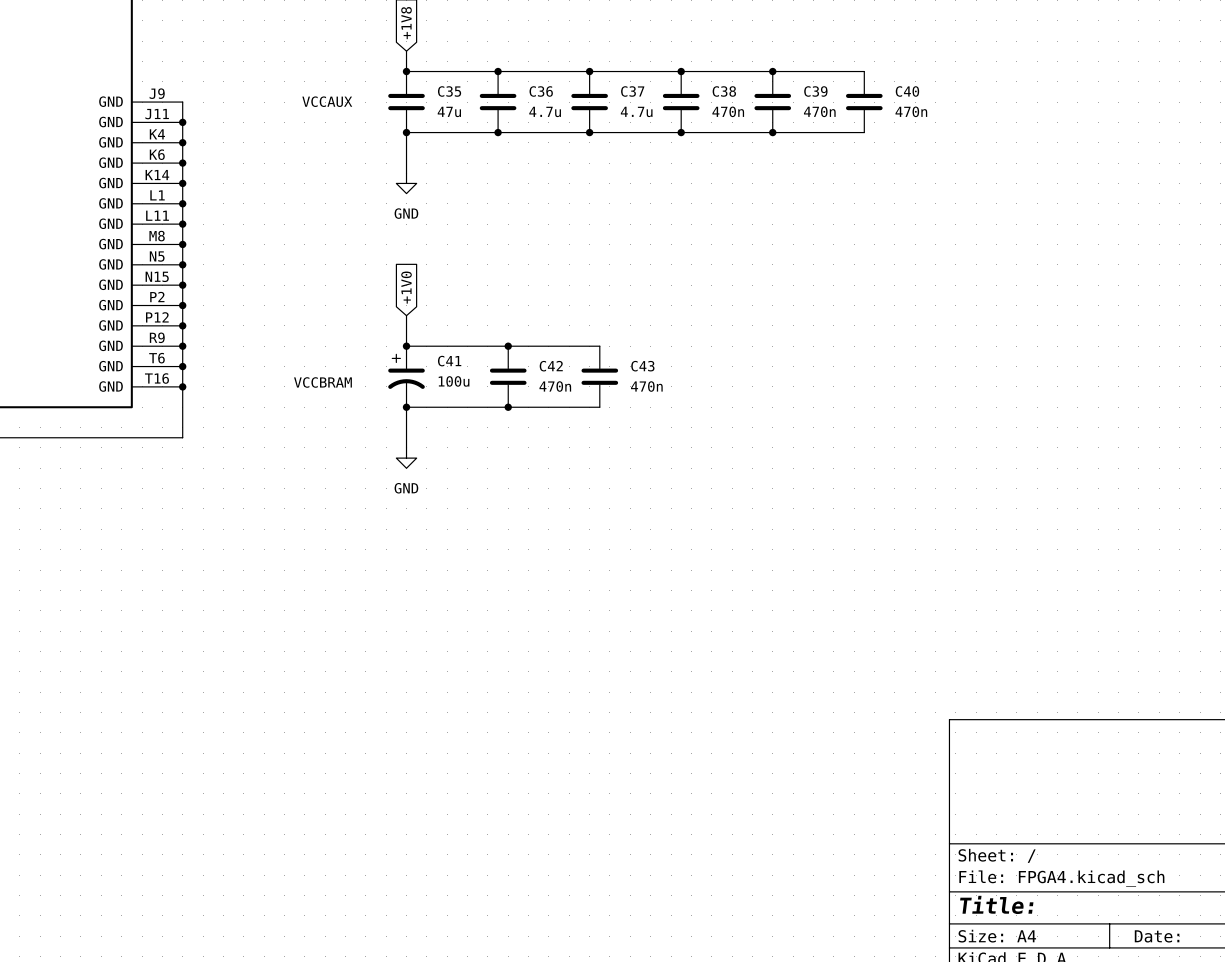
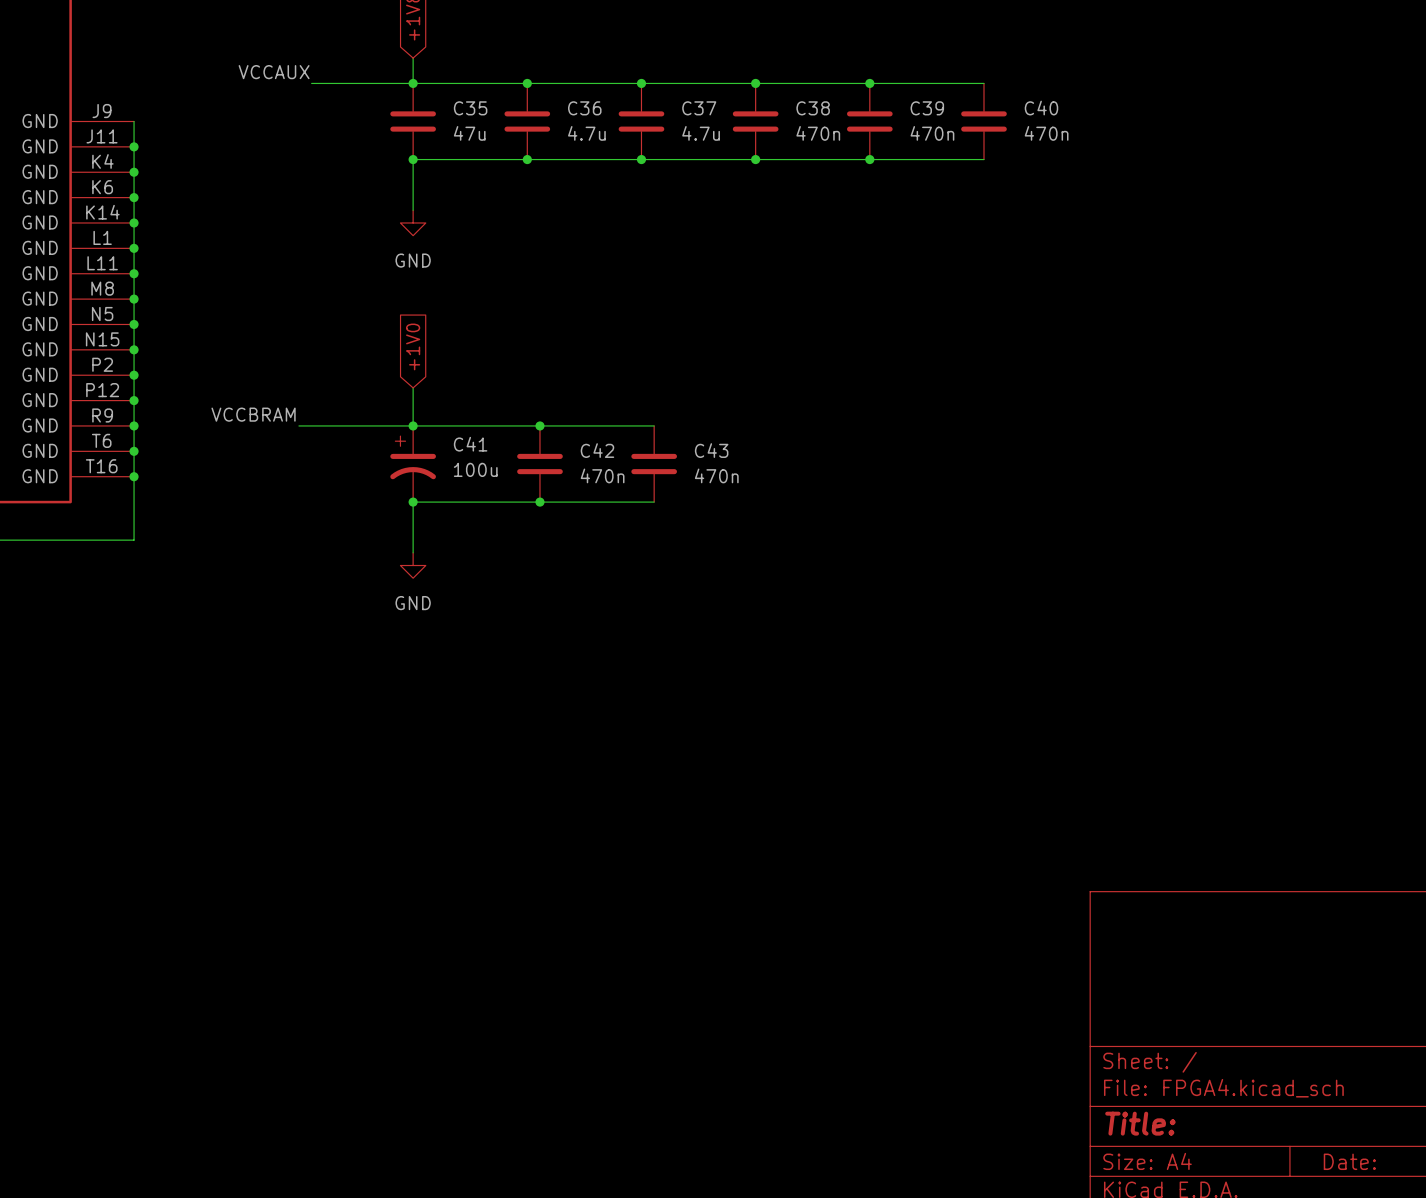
label: none -> VCCAUX (274, 72)
wire: none -> (311, 83) (413, 83)
text: VCCAUX (327, 101) -> none
label: none -> VCCBRAM (253, 414)
wire: none -> (298, 425) (413, 425)
text: VCCBRAM (322, 382) -> none

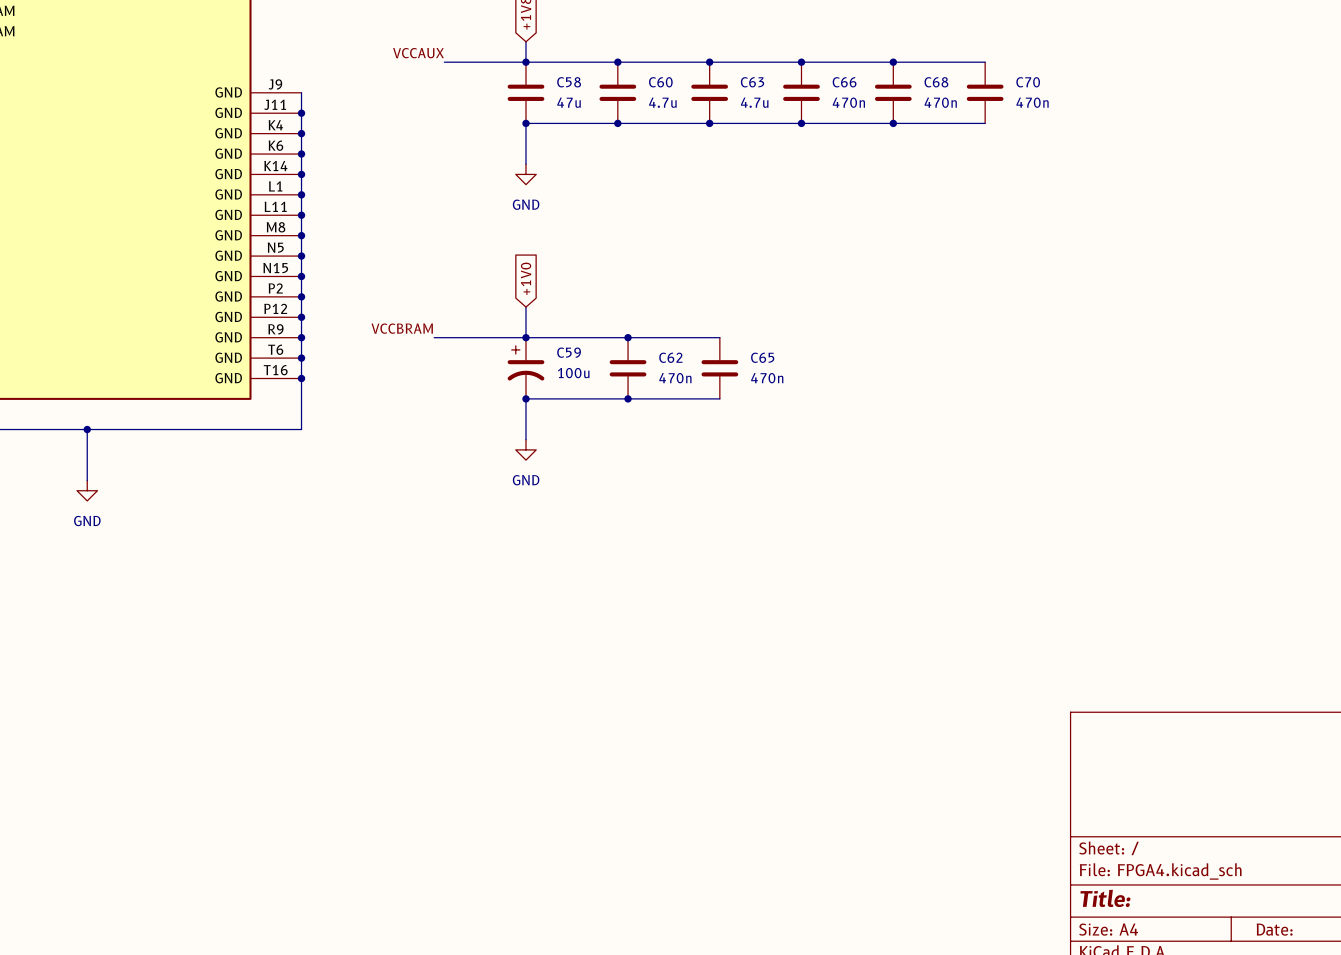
C35 name: C35 (470, 108) -> C58 (569, 82)
C36 name: C36 (584, 108) -> C60 (660, 82)
C37 name: C37 (699, 108) -> C63 (752, 82)
C38 name: C38 (813, 108) -> C66 (844, 82)
C39 name: C39 (927, 108) -> C68 (936, 82)
C40 name: C40 (1041, 108) -> C70 (1028, 82)
C41 name: C41 (470, 444) -> C59 (569, 352)
C42 name: C42 (597, 450) -> C62 (670, 357)
C43 name: C43 (711, 450) -> C65 (762, 357)

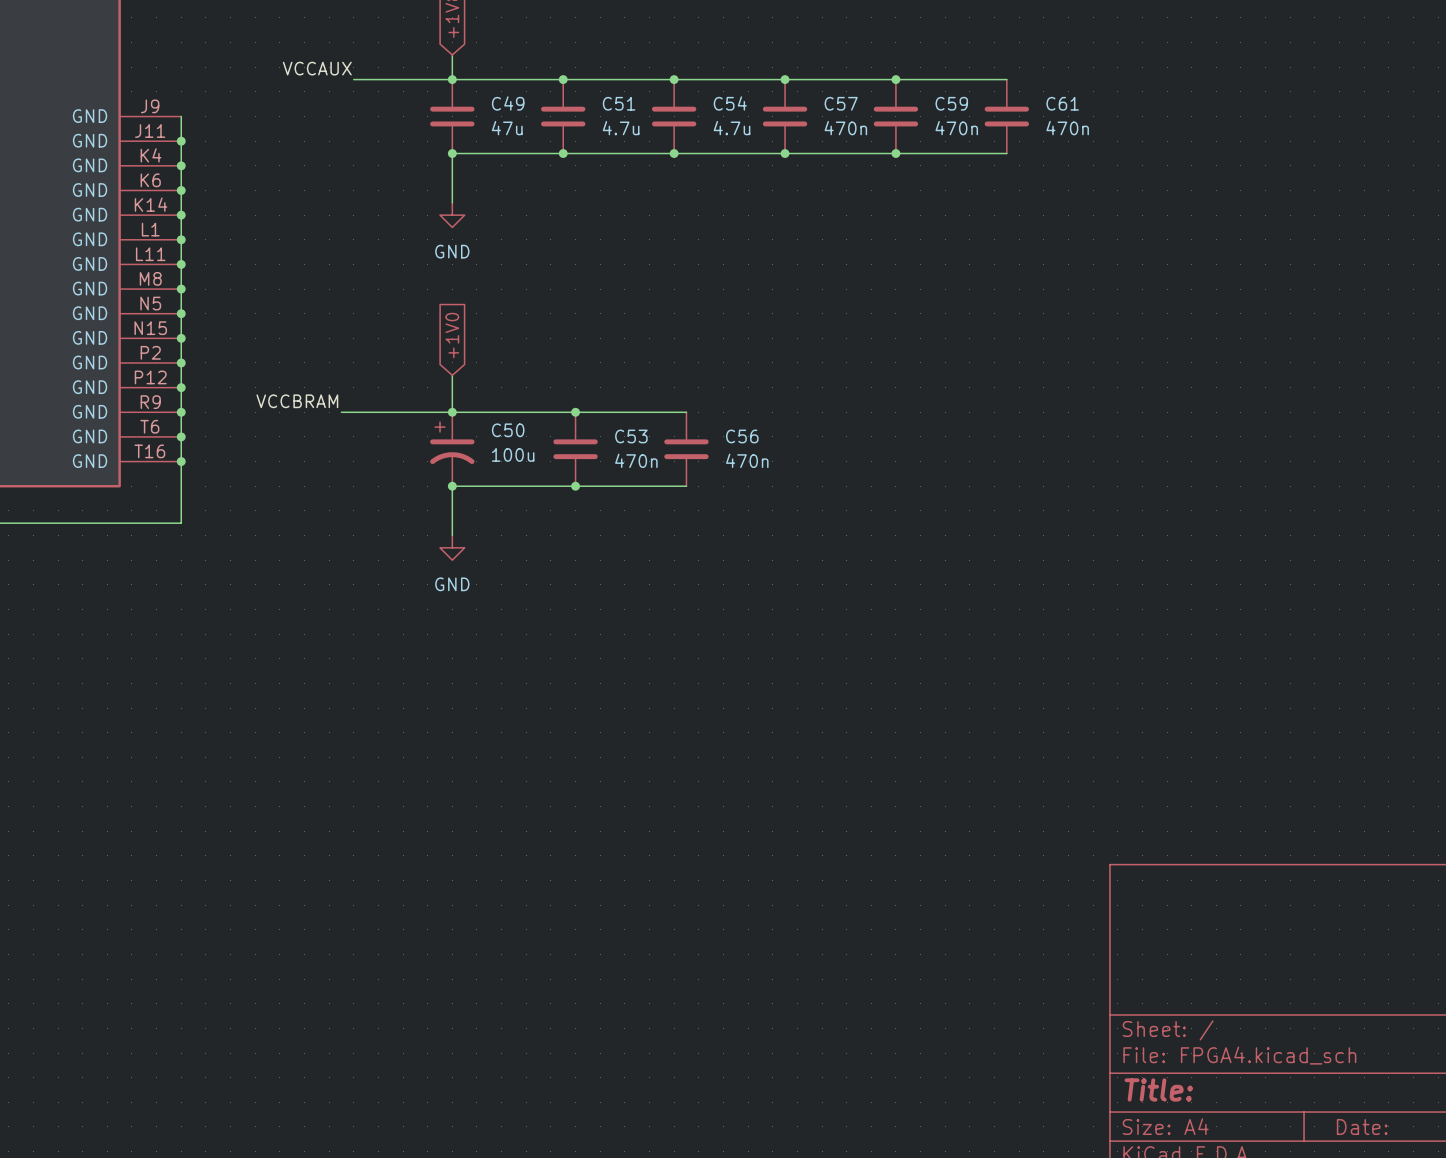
C58 name: C58 (569, 82) -> C49 (508, 103)
C60 name: C60 (660, 82) -> C51 (619, 103)
C63 name: C63 (752, 82) -> C54 (730, 103)
C66 name: C66 (844, 82) -> C57 (841, 103)
C68 name: C68 (936, 82) -> C59 (951, 103)
C70 name: C70 (1028, 82) -> C61 (1062, 103)
C59 name: C59 (569, 352) -> C50 (508, 430)
C62 name: C62 (670, 357) -> C53 (631, 436)
C65 name: C65 (762, 357) -> C56 (742, 436)

